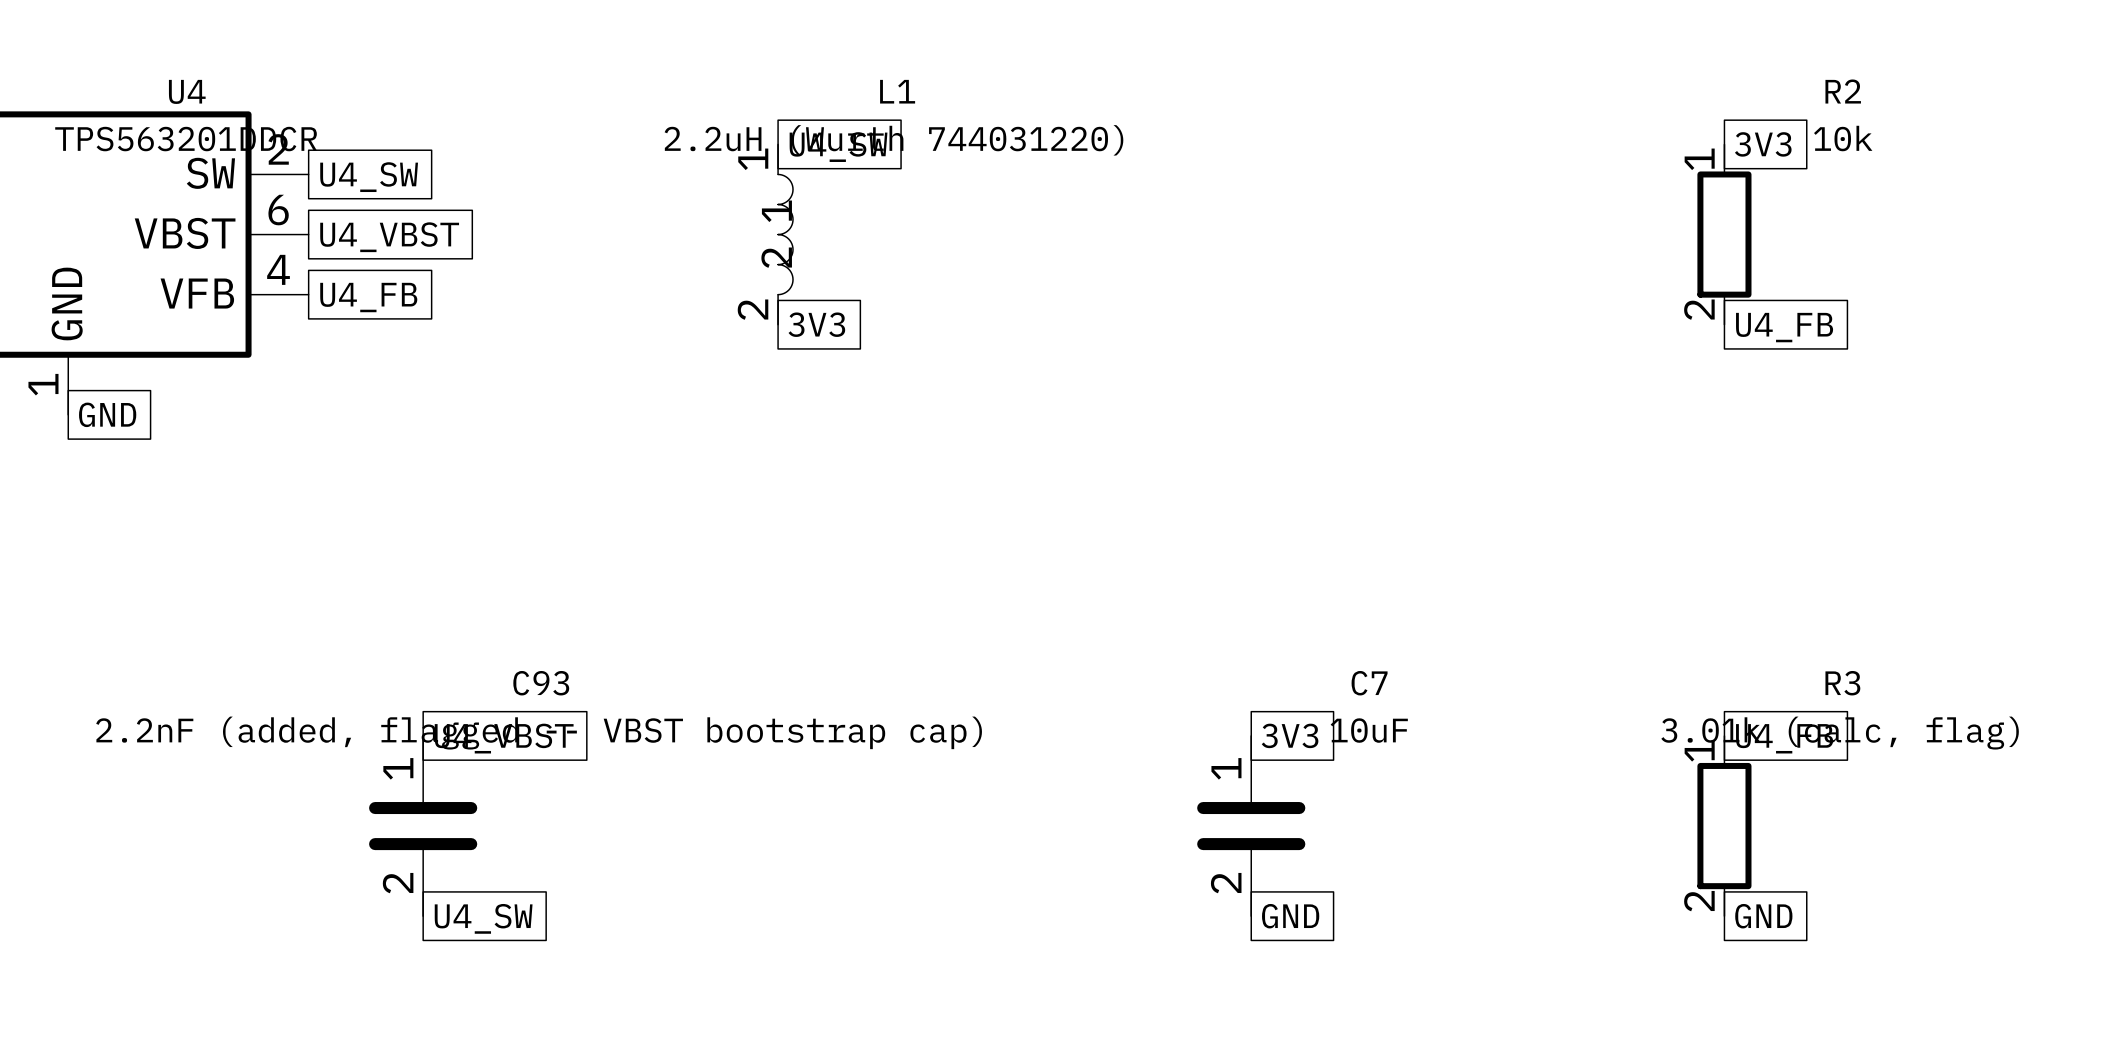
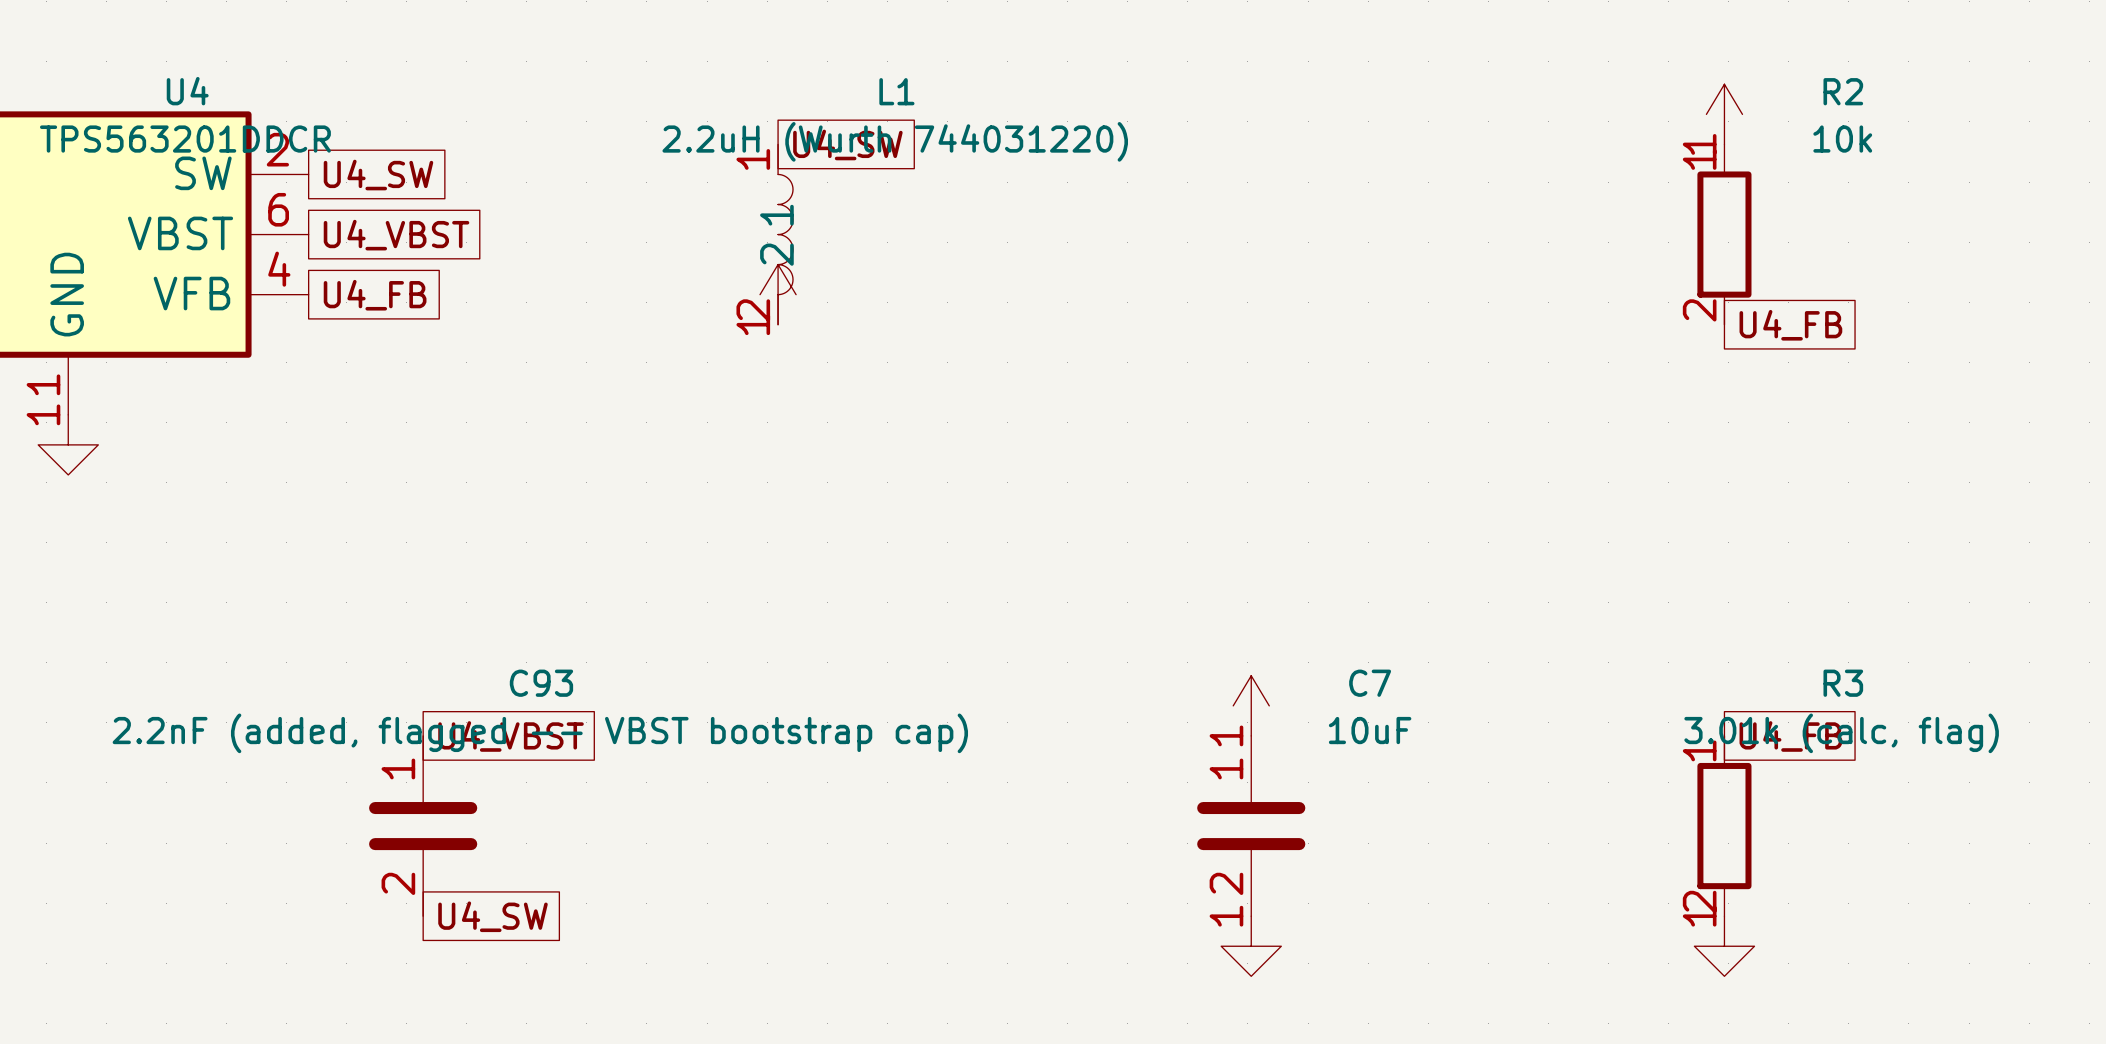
power symbol: none -> (1724, 114)
global label: 3V3 (1763, 144) -> none
power symbol: none -> (778, 294)
global label: 3V3 (816, 324) -> none
global label: GND (107, 414) -> none
power symbol: none -> (68, 444)
power symbol: none -> (1251, 705)
global label: 3V3 (1290, 735) -> none
global label: GND (1290, 916) -> none
global label: GND (1763, 916) -> none
power symbol: none -> (1251, 946)
power symbol: none -> (1724, 946)

